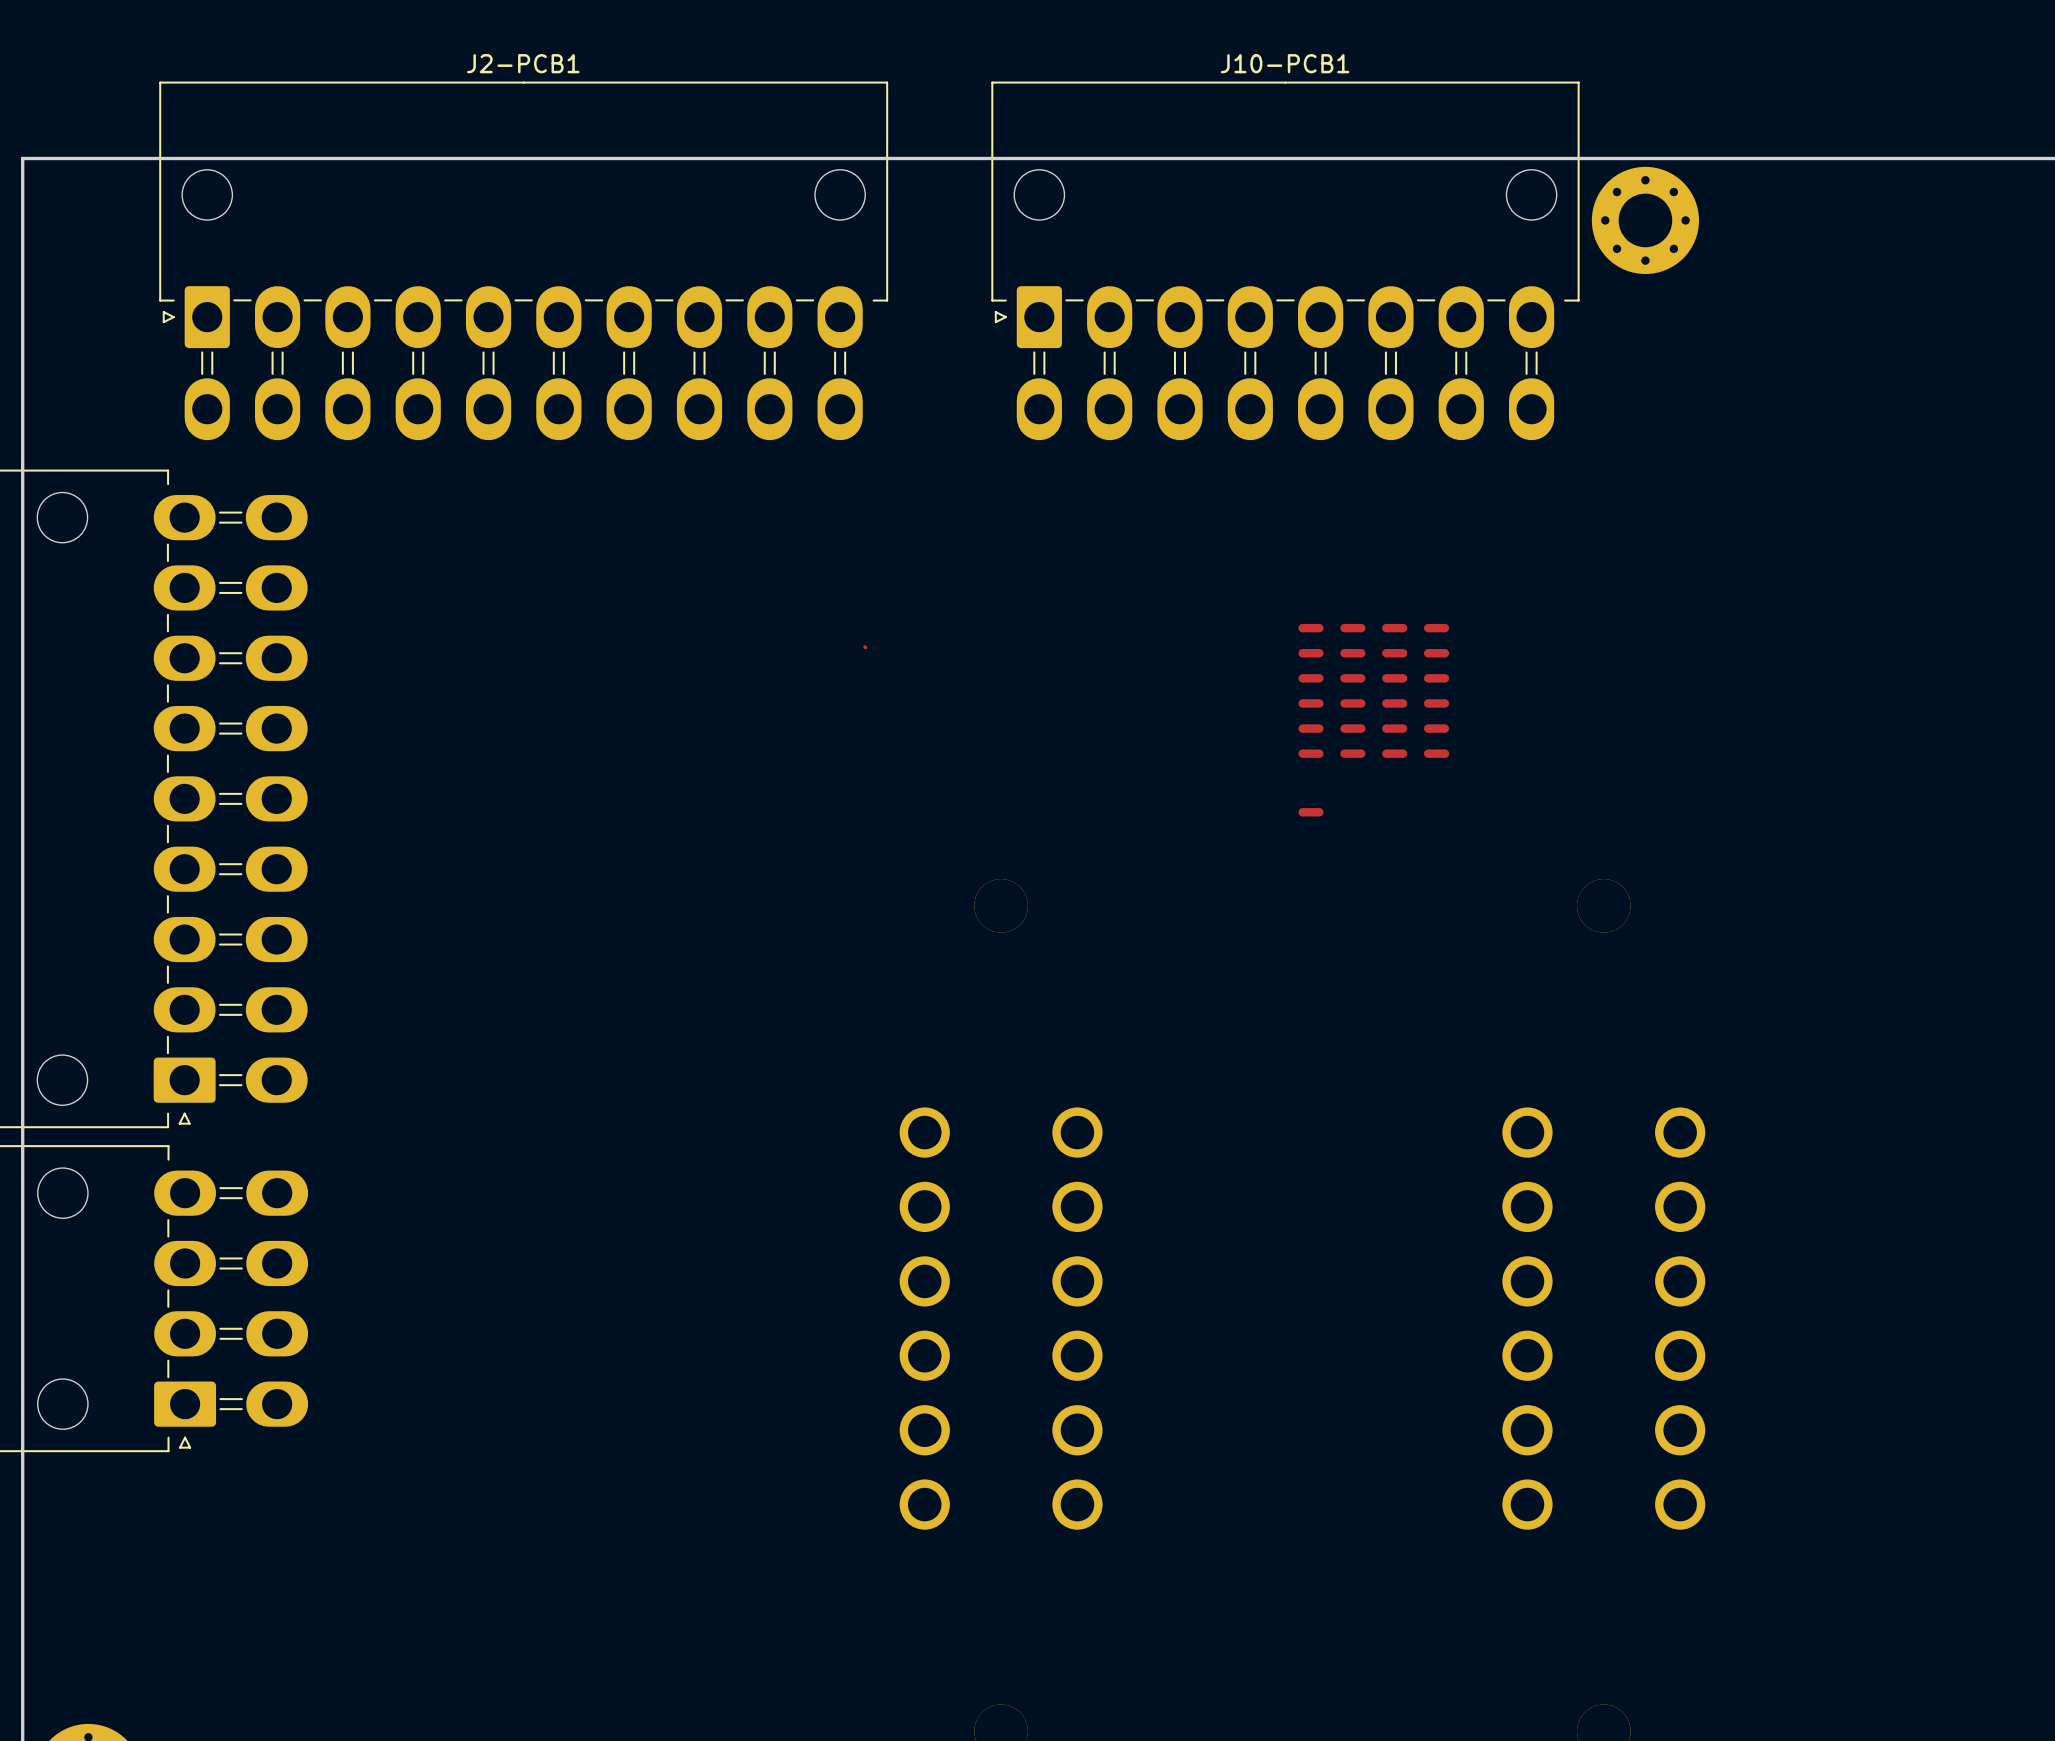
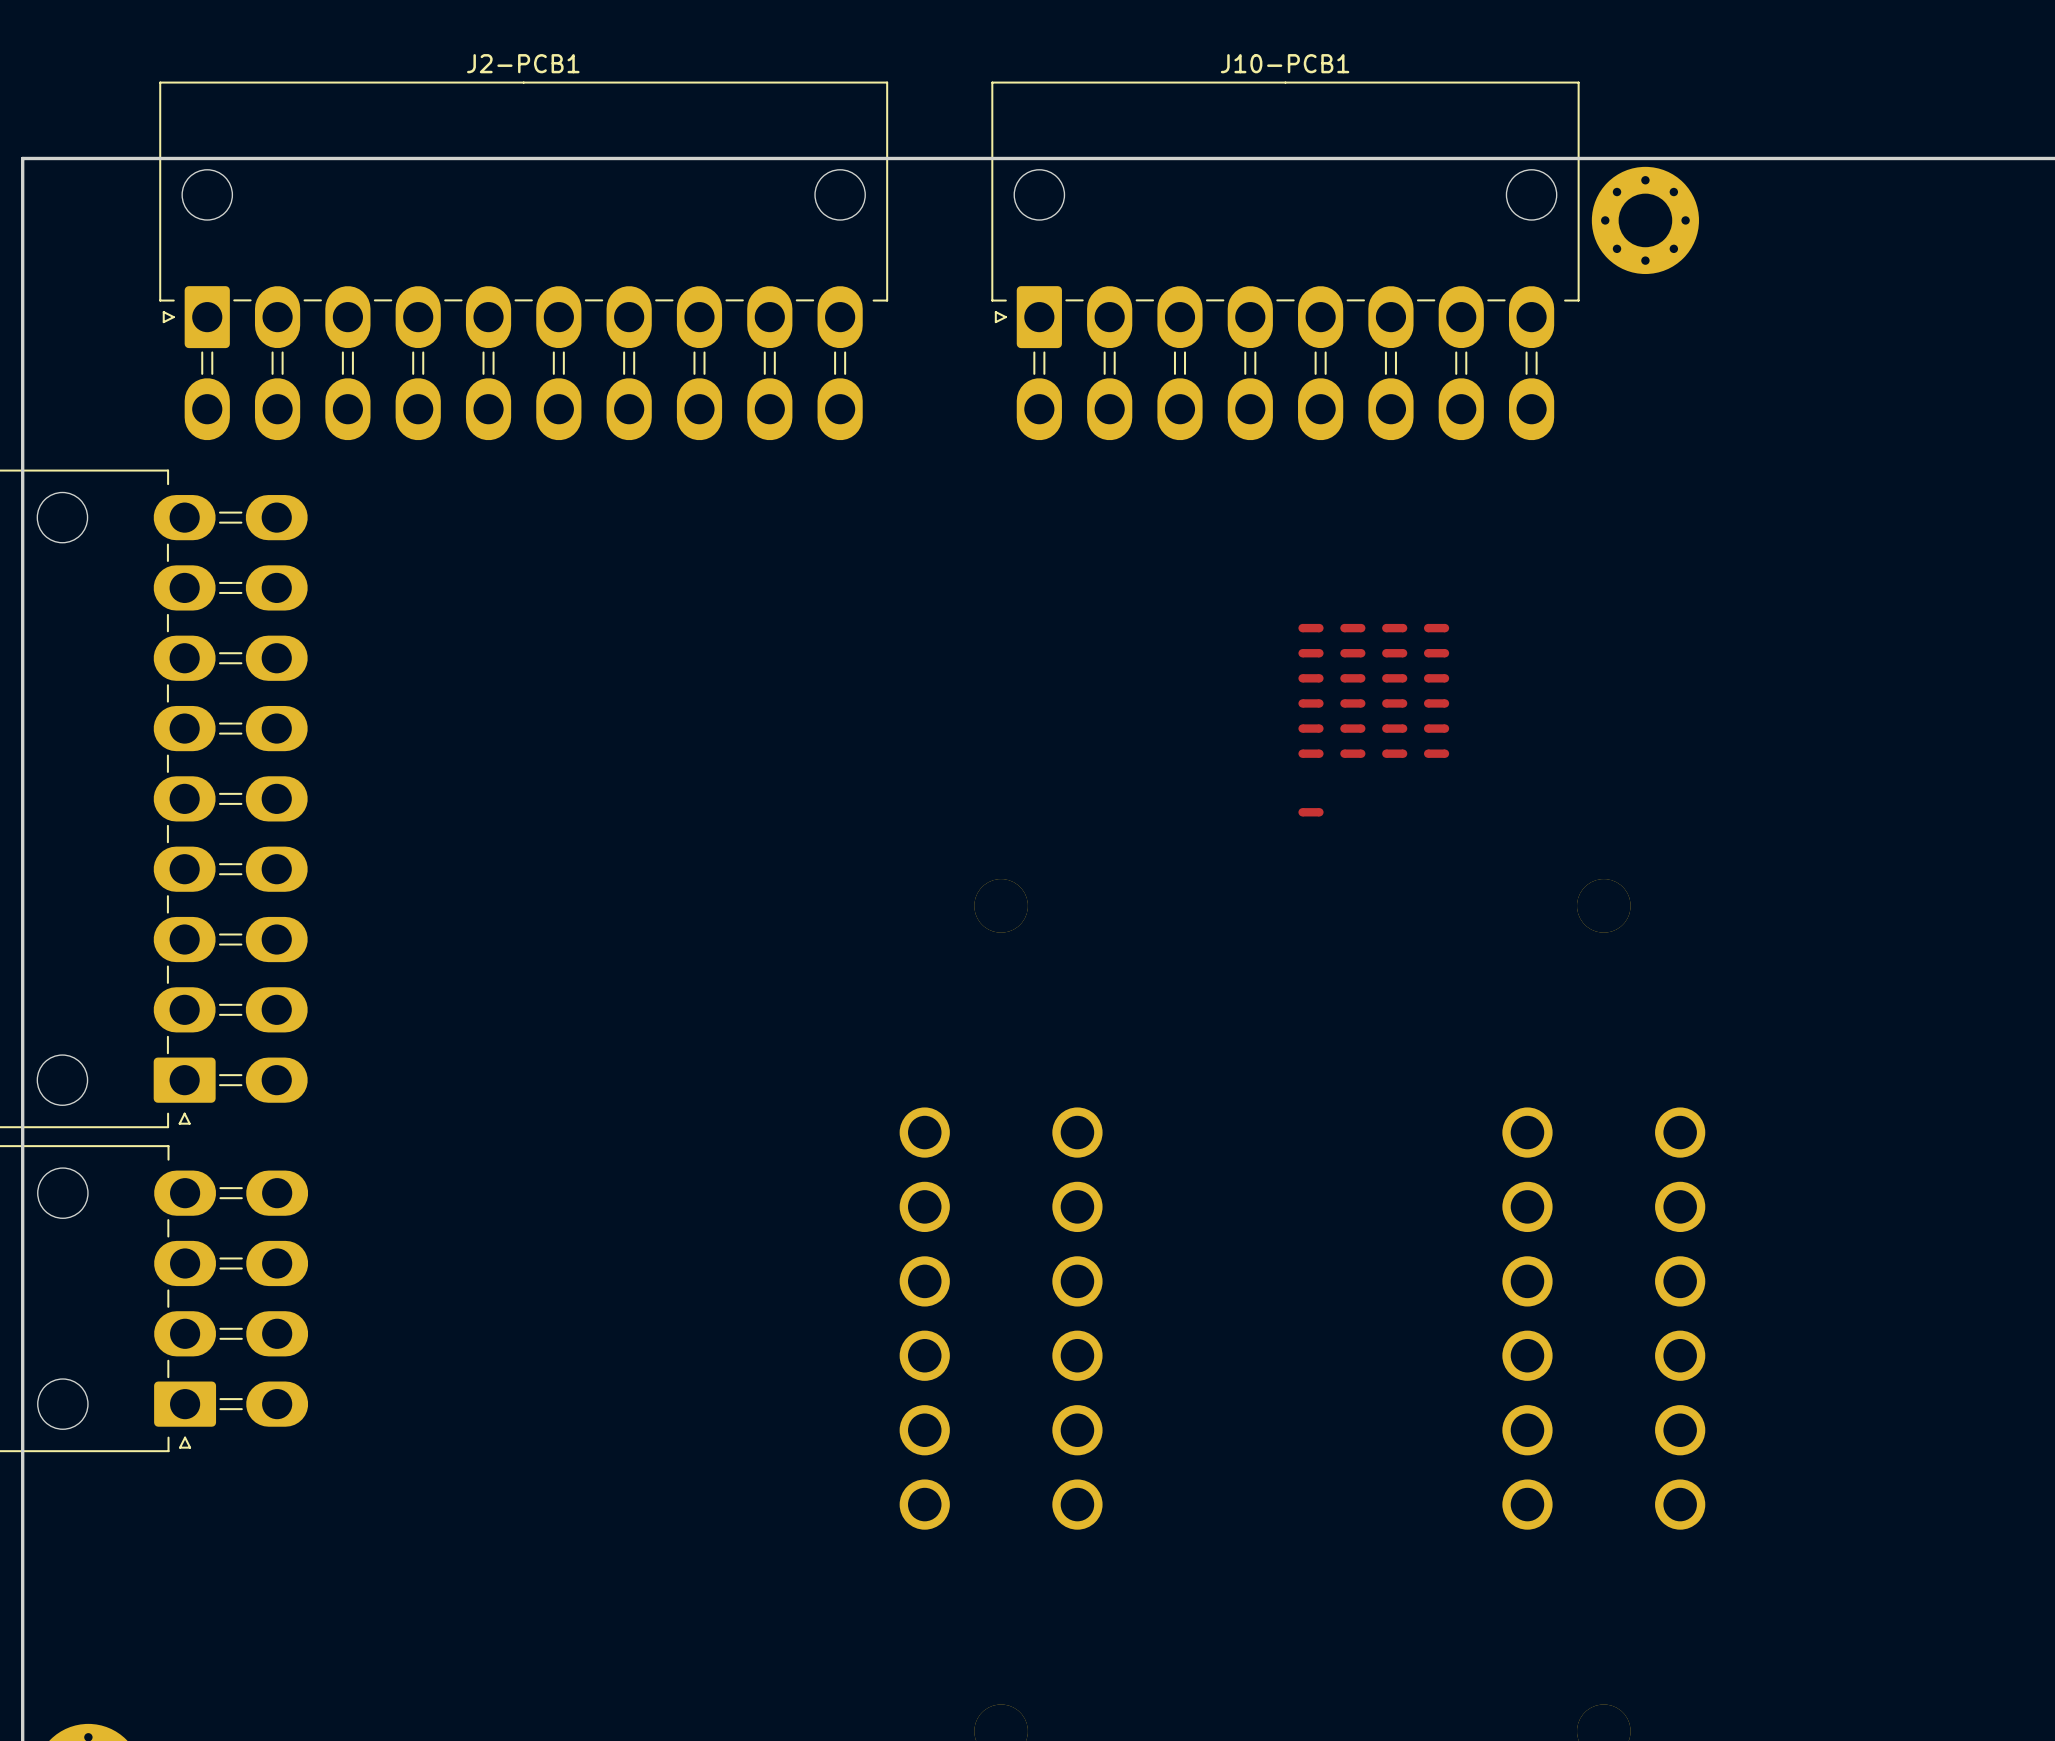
top track: (864, 646) (865, 647) -> none

